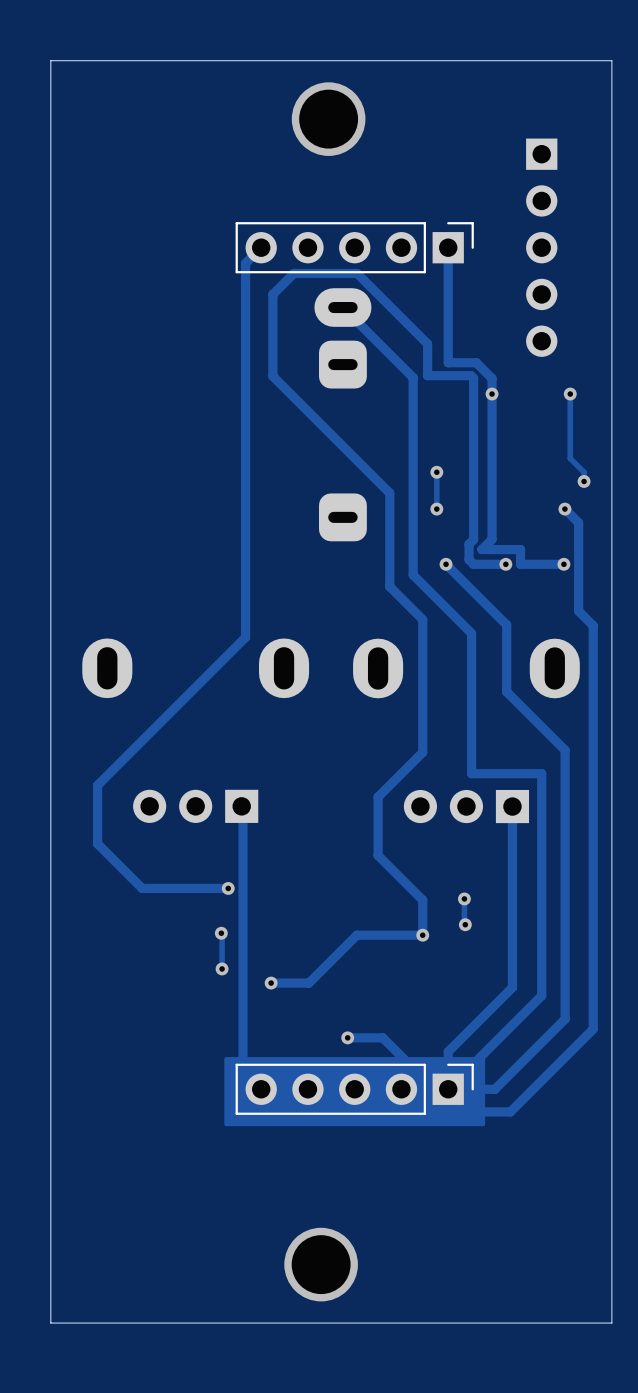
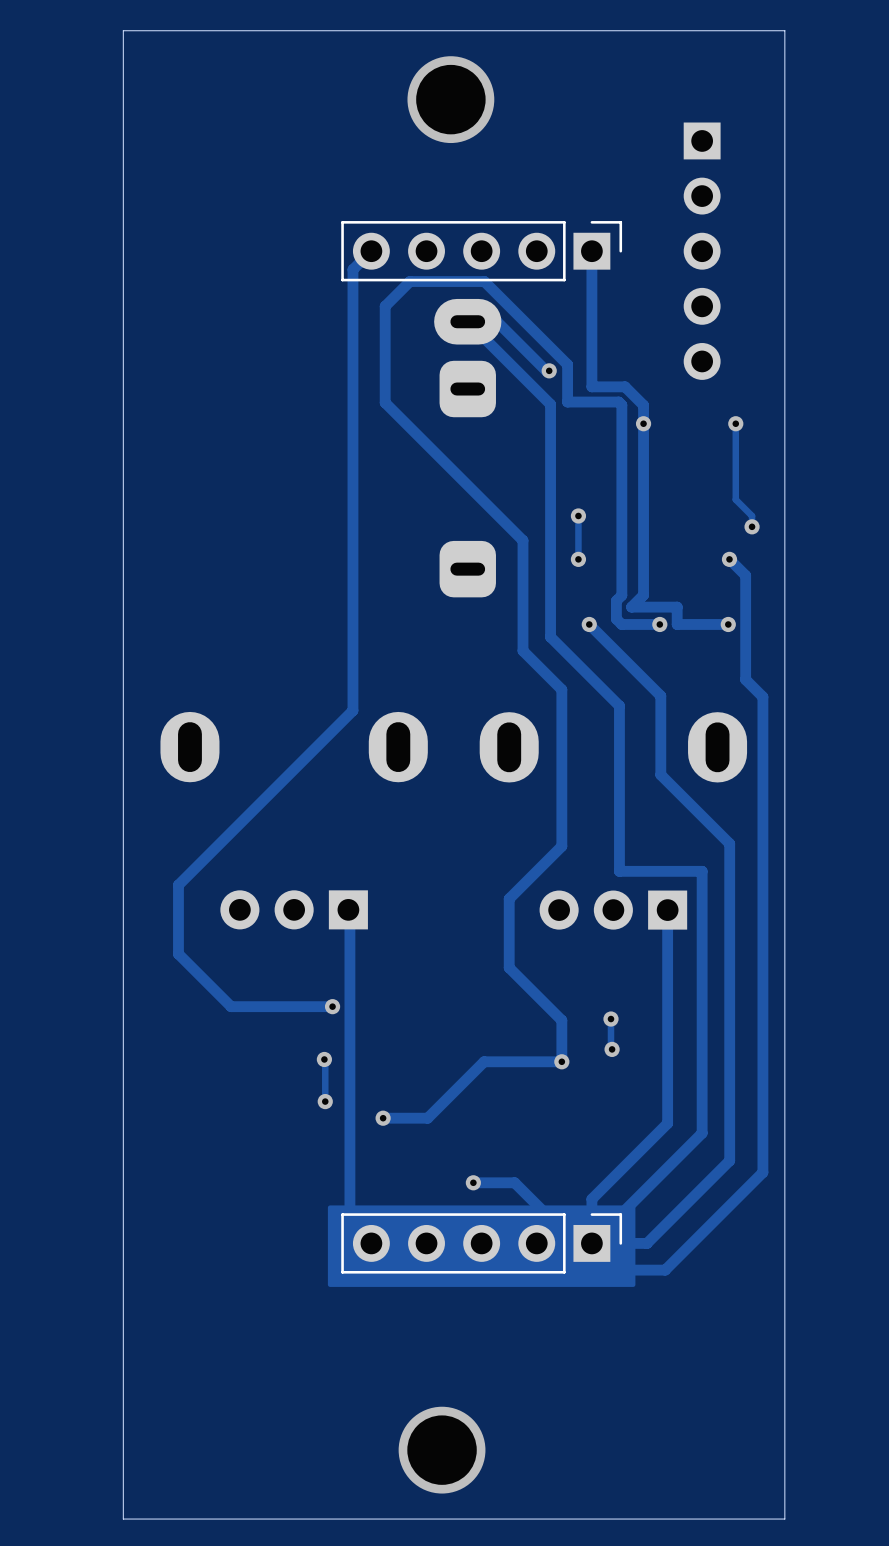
track: none -> (467, 321) (497, 321) (546, 370) (549, 370)
via: none -> (549, 370)

